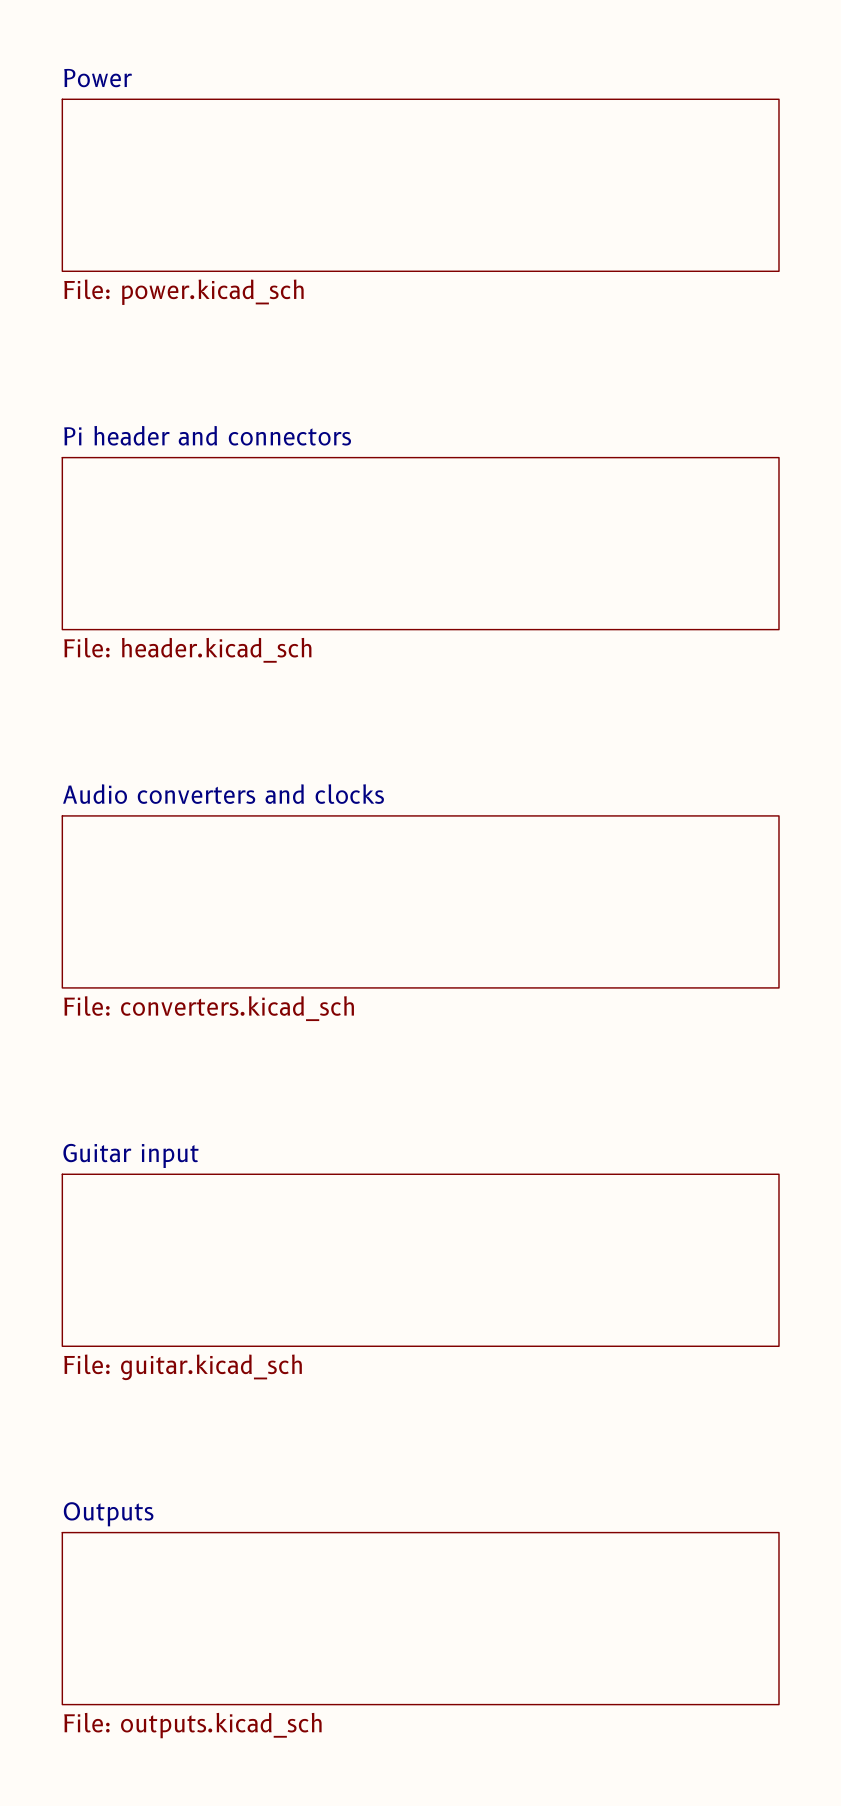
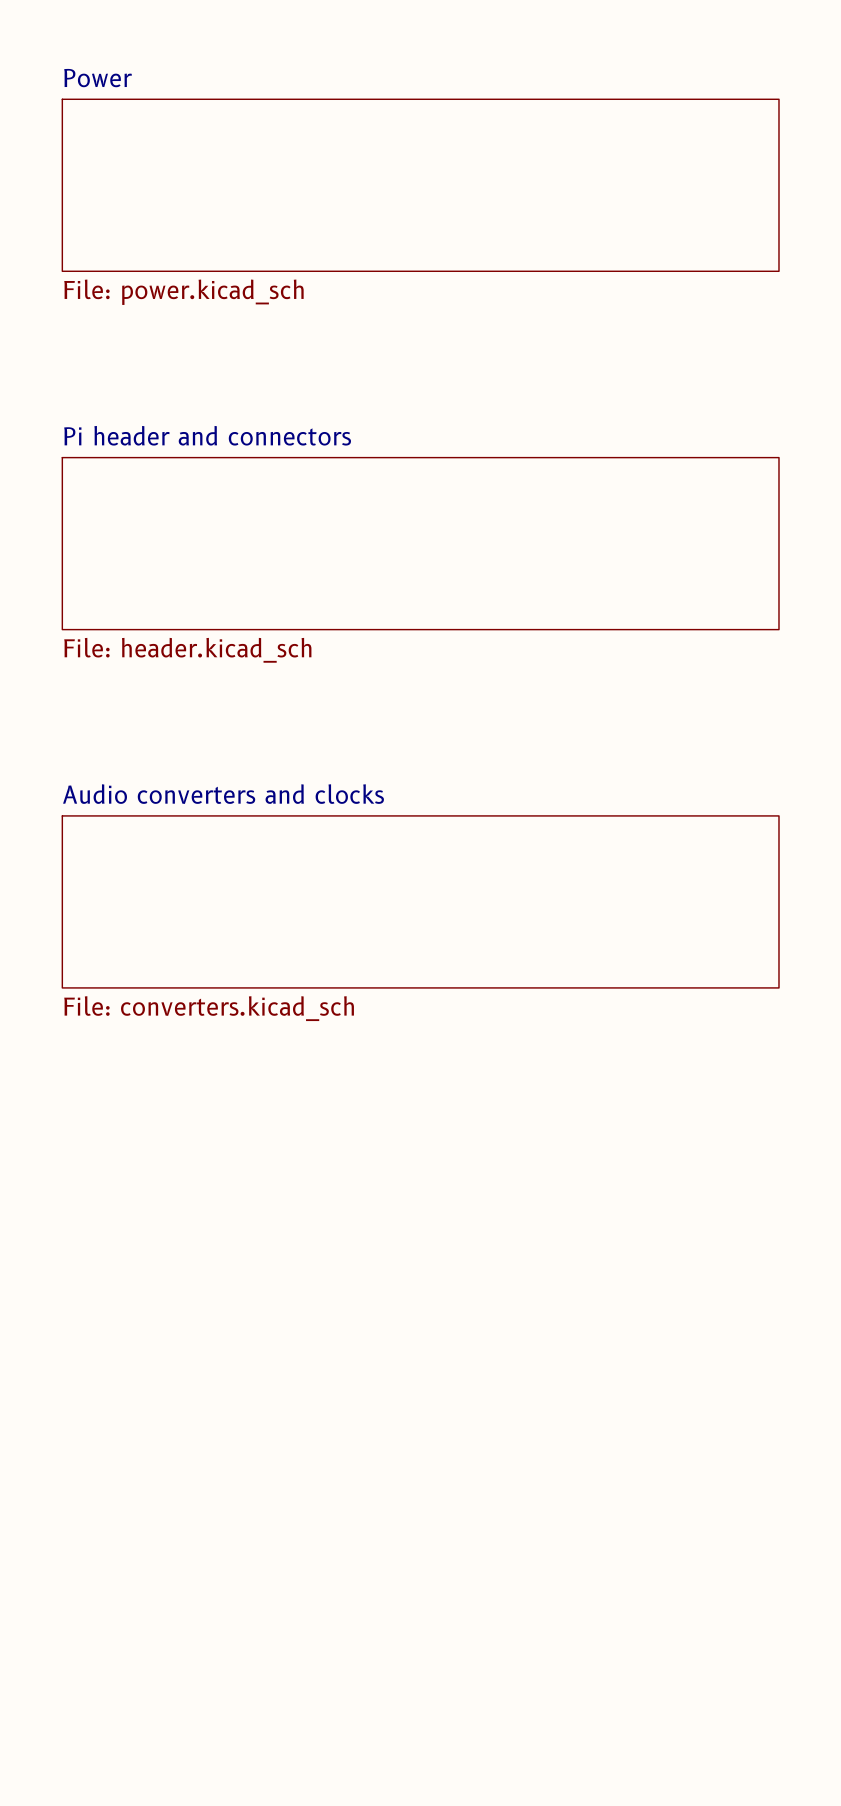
sheet Guitar input: File: guitar.kicad_sch (420, 1260) -> none
sheet Outputs: File: outputs.kicad_sch (420, 1618) -> none

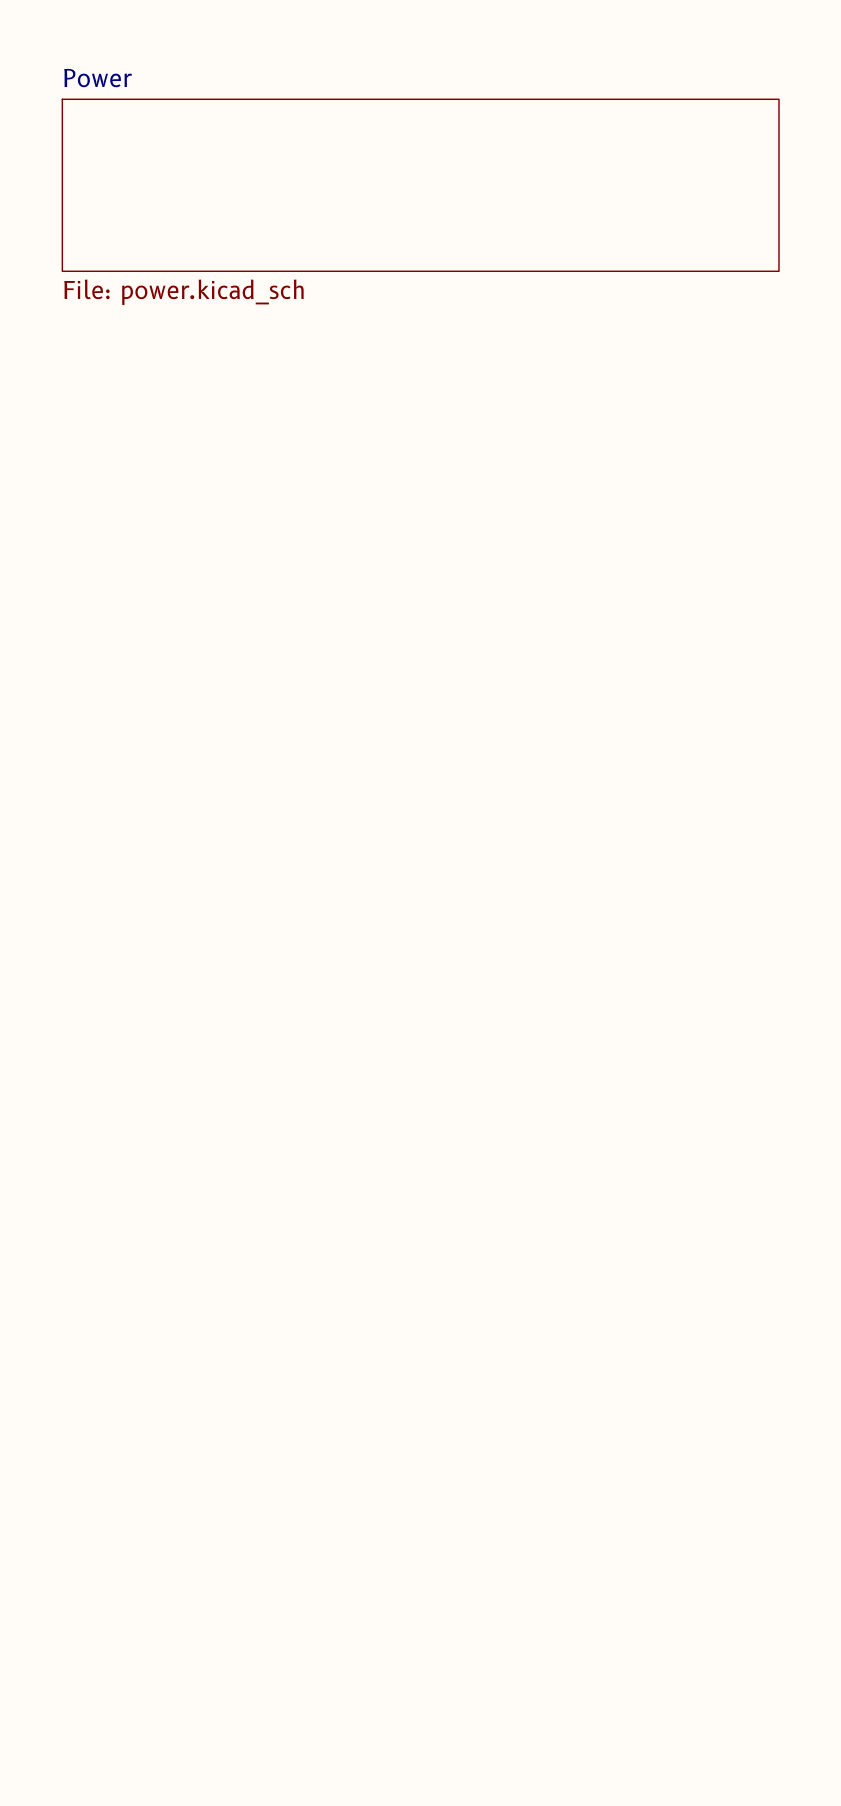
sheet Pi header and connectors: File: header.kicad_sch (420, 543) -> none
sheet Audio converters and clocks: File: converters.kicad_sch (420, 901) -> none

